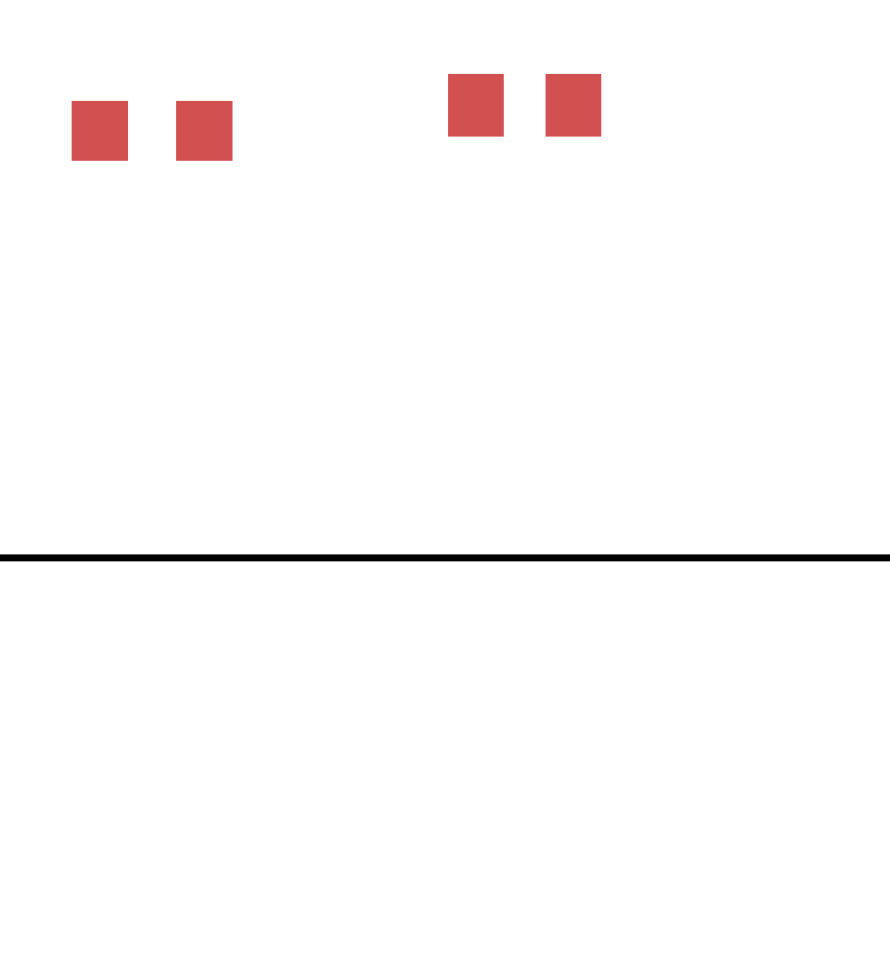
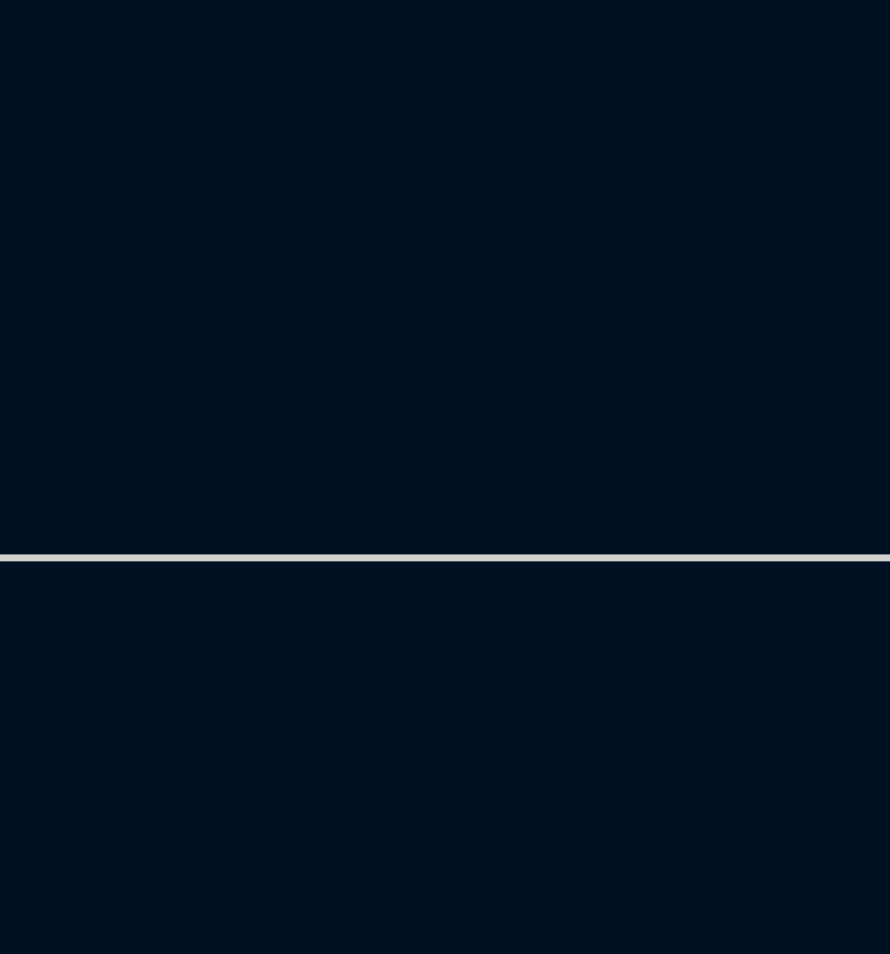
part: (524, 105) -> none
part: (152, 130) -> none

